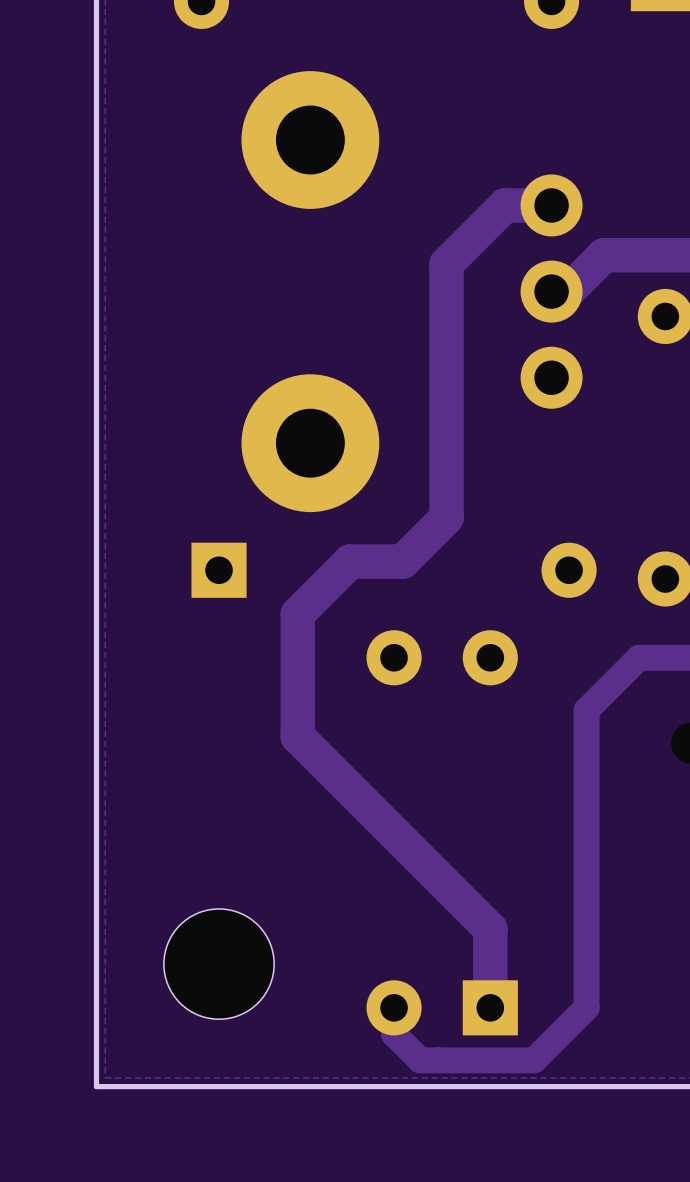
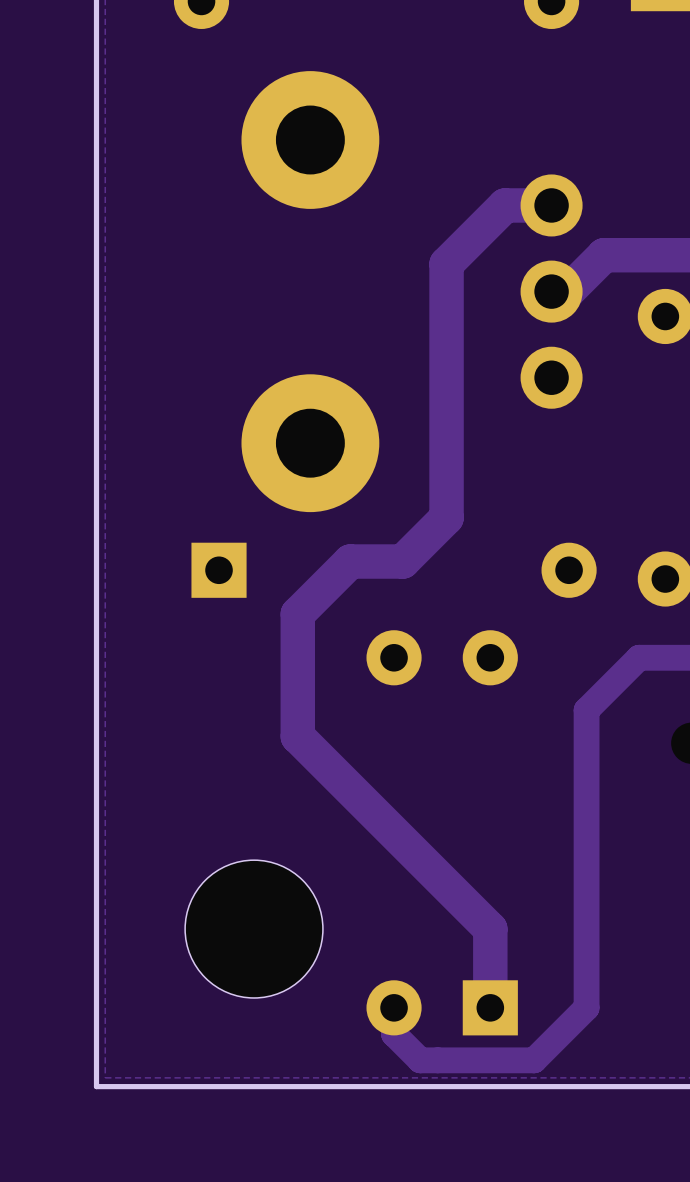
part: none -> (254, 929)
part: (219, 964) -> none

